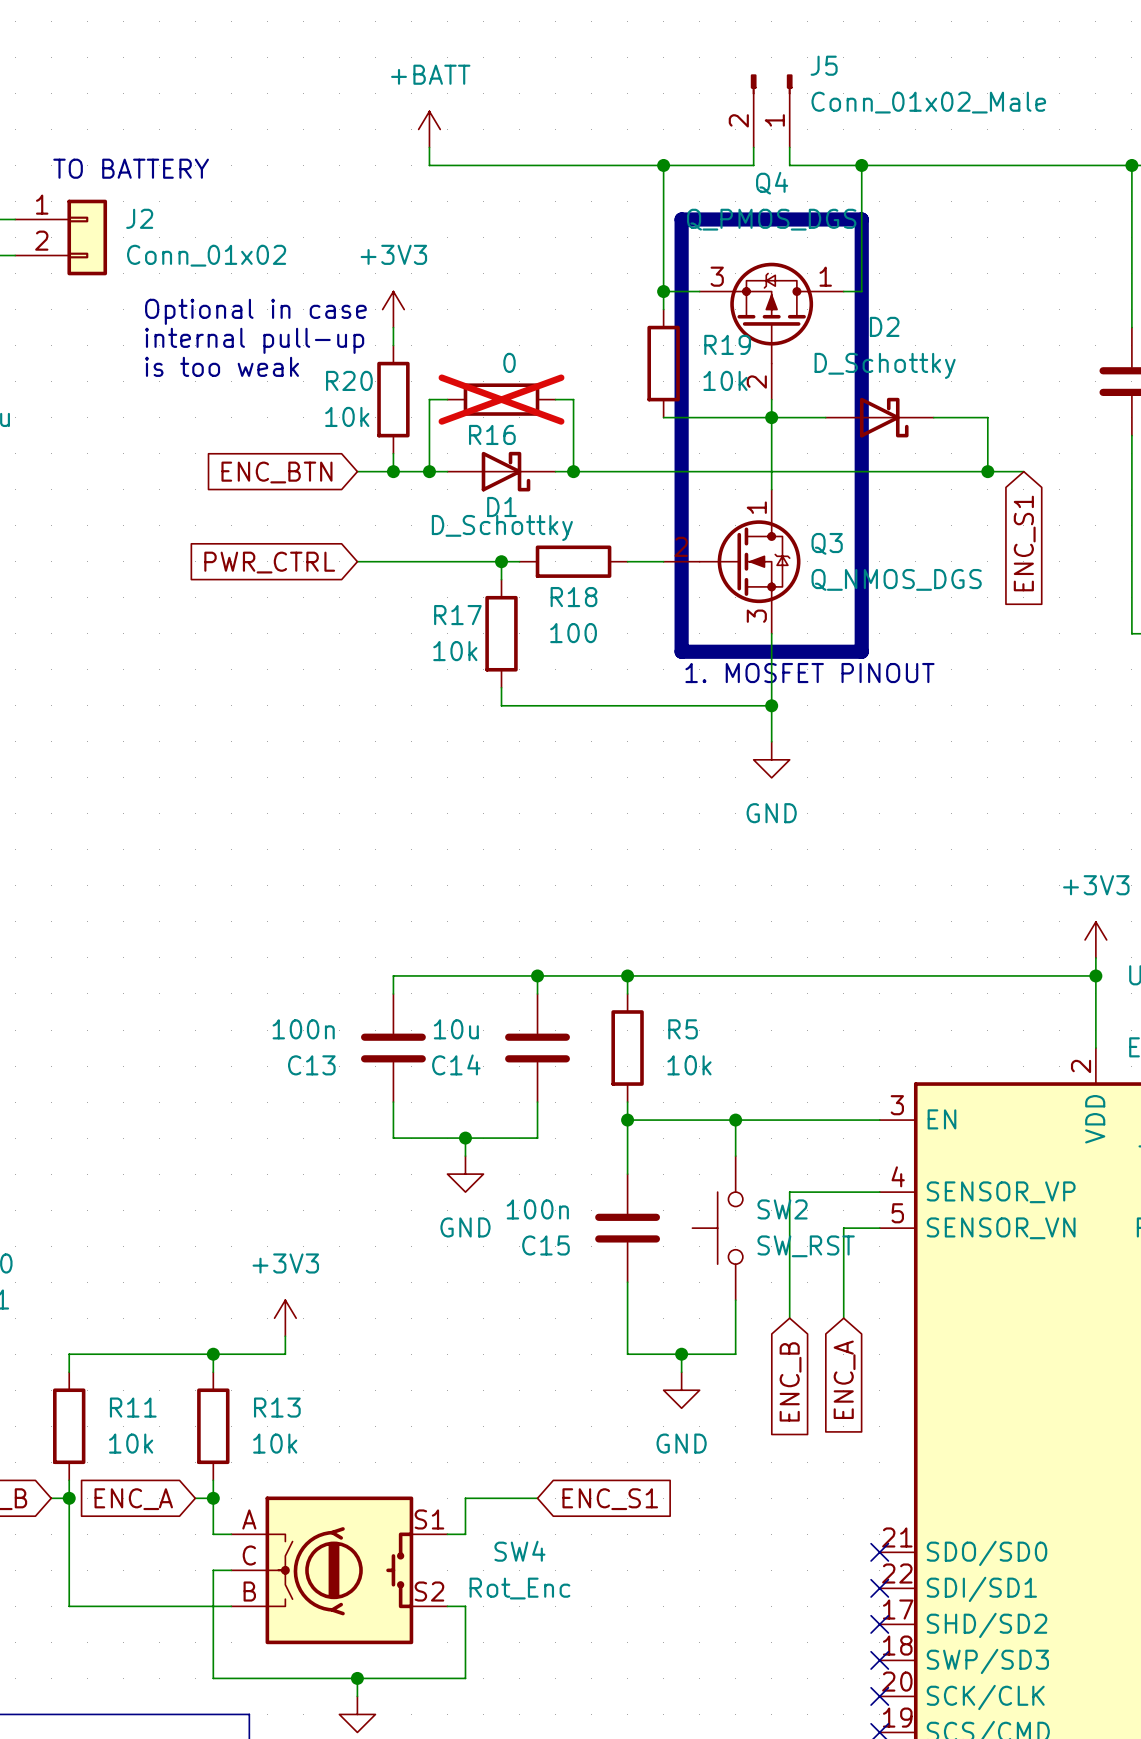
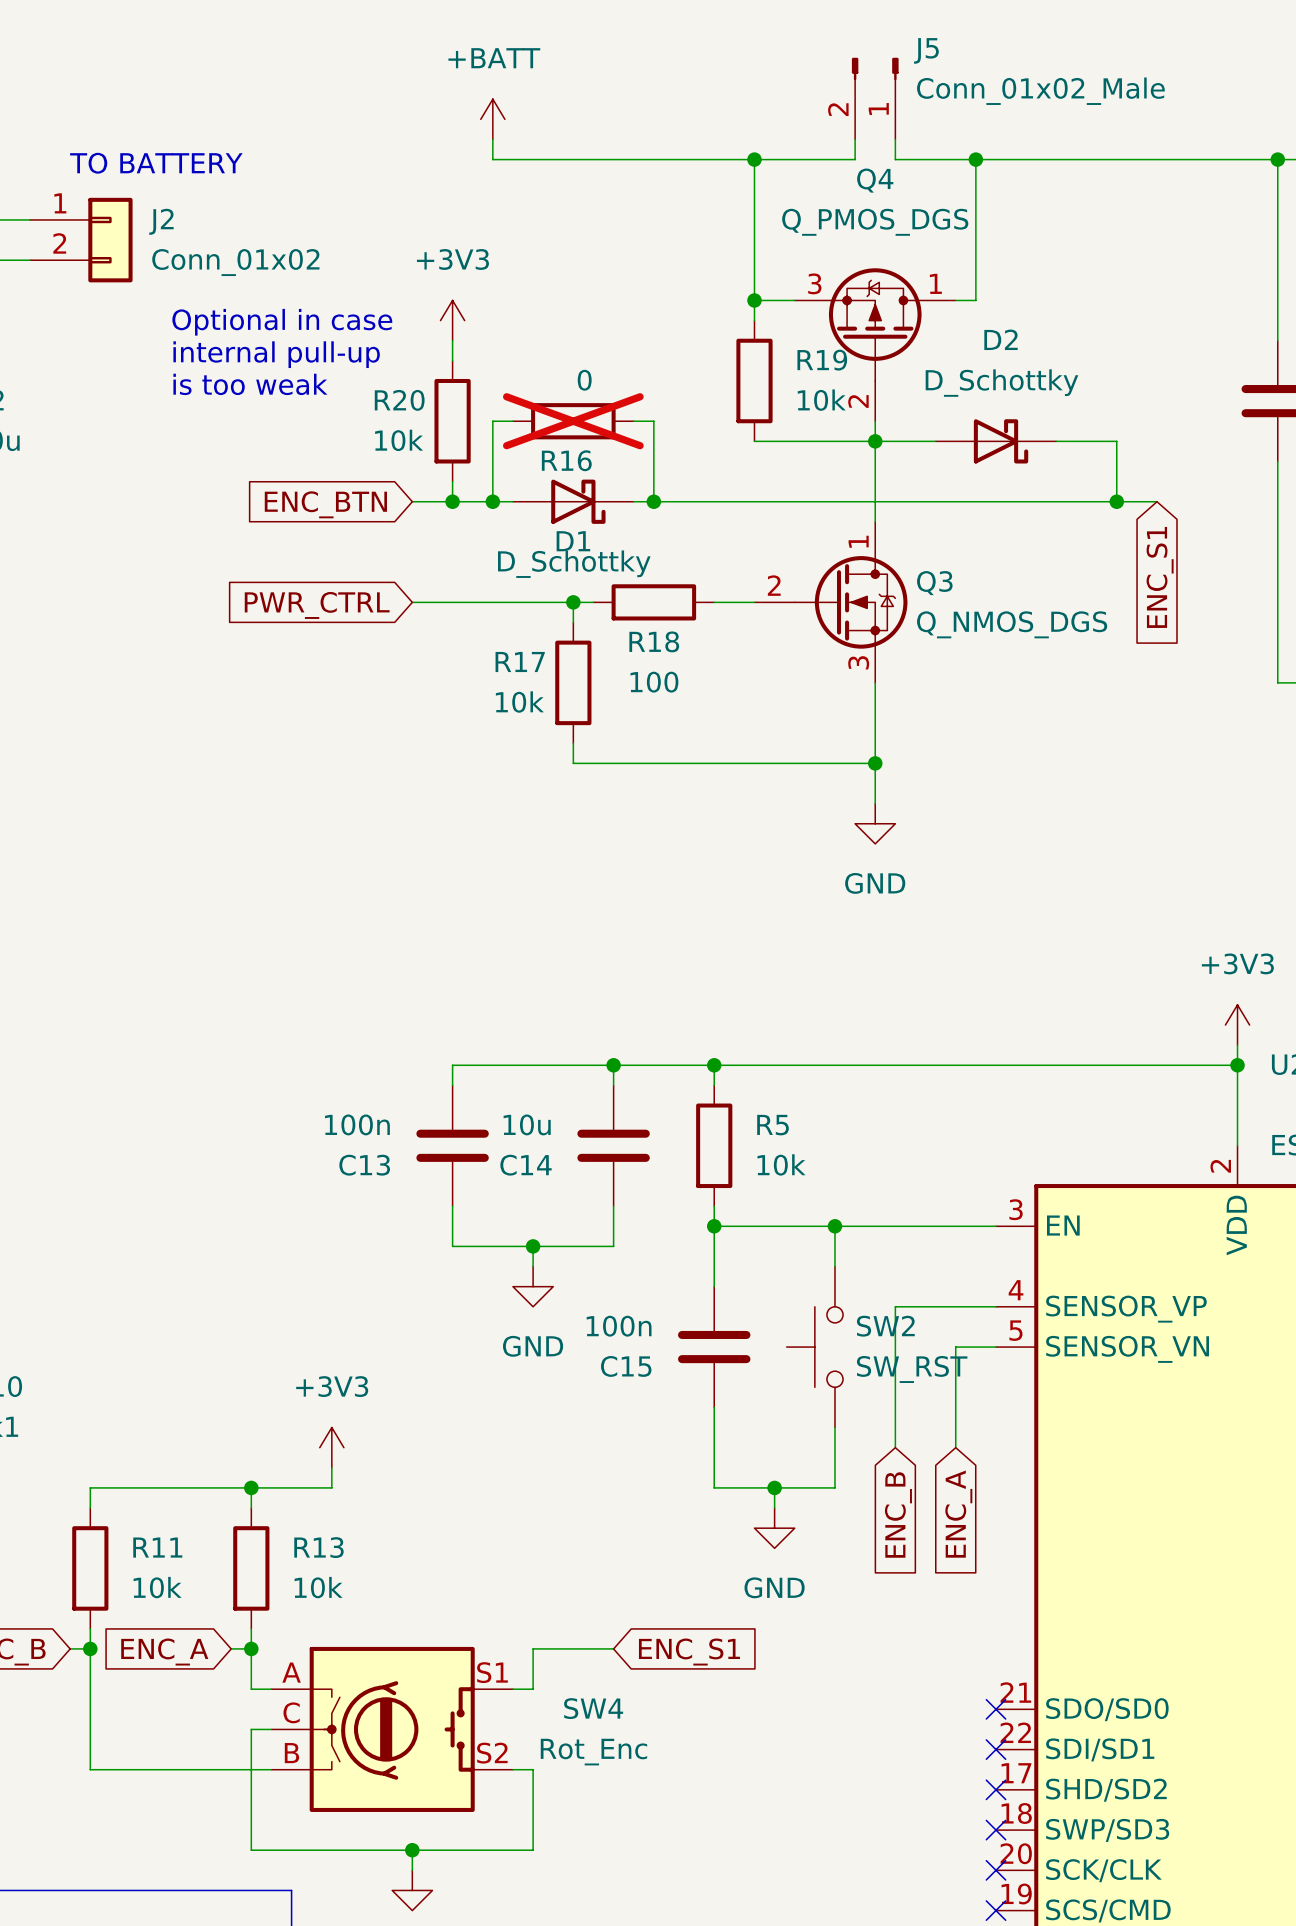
line: (681, 219) (861, 219) (861, 651) (681, 651) (681, 219) -> none
text: 1. MOSFET PINOUT (809, 673) -> none

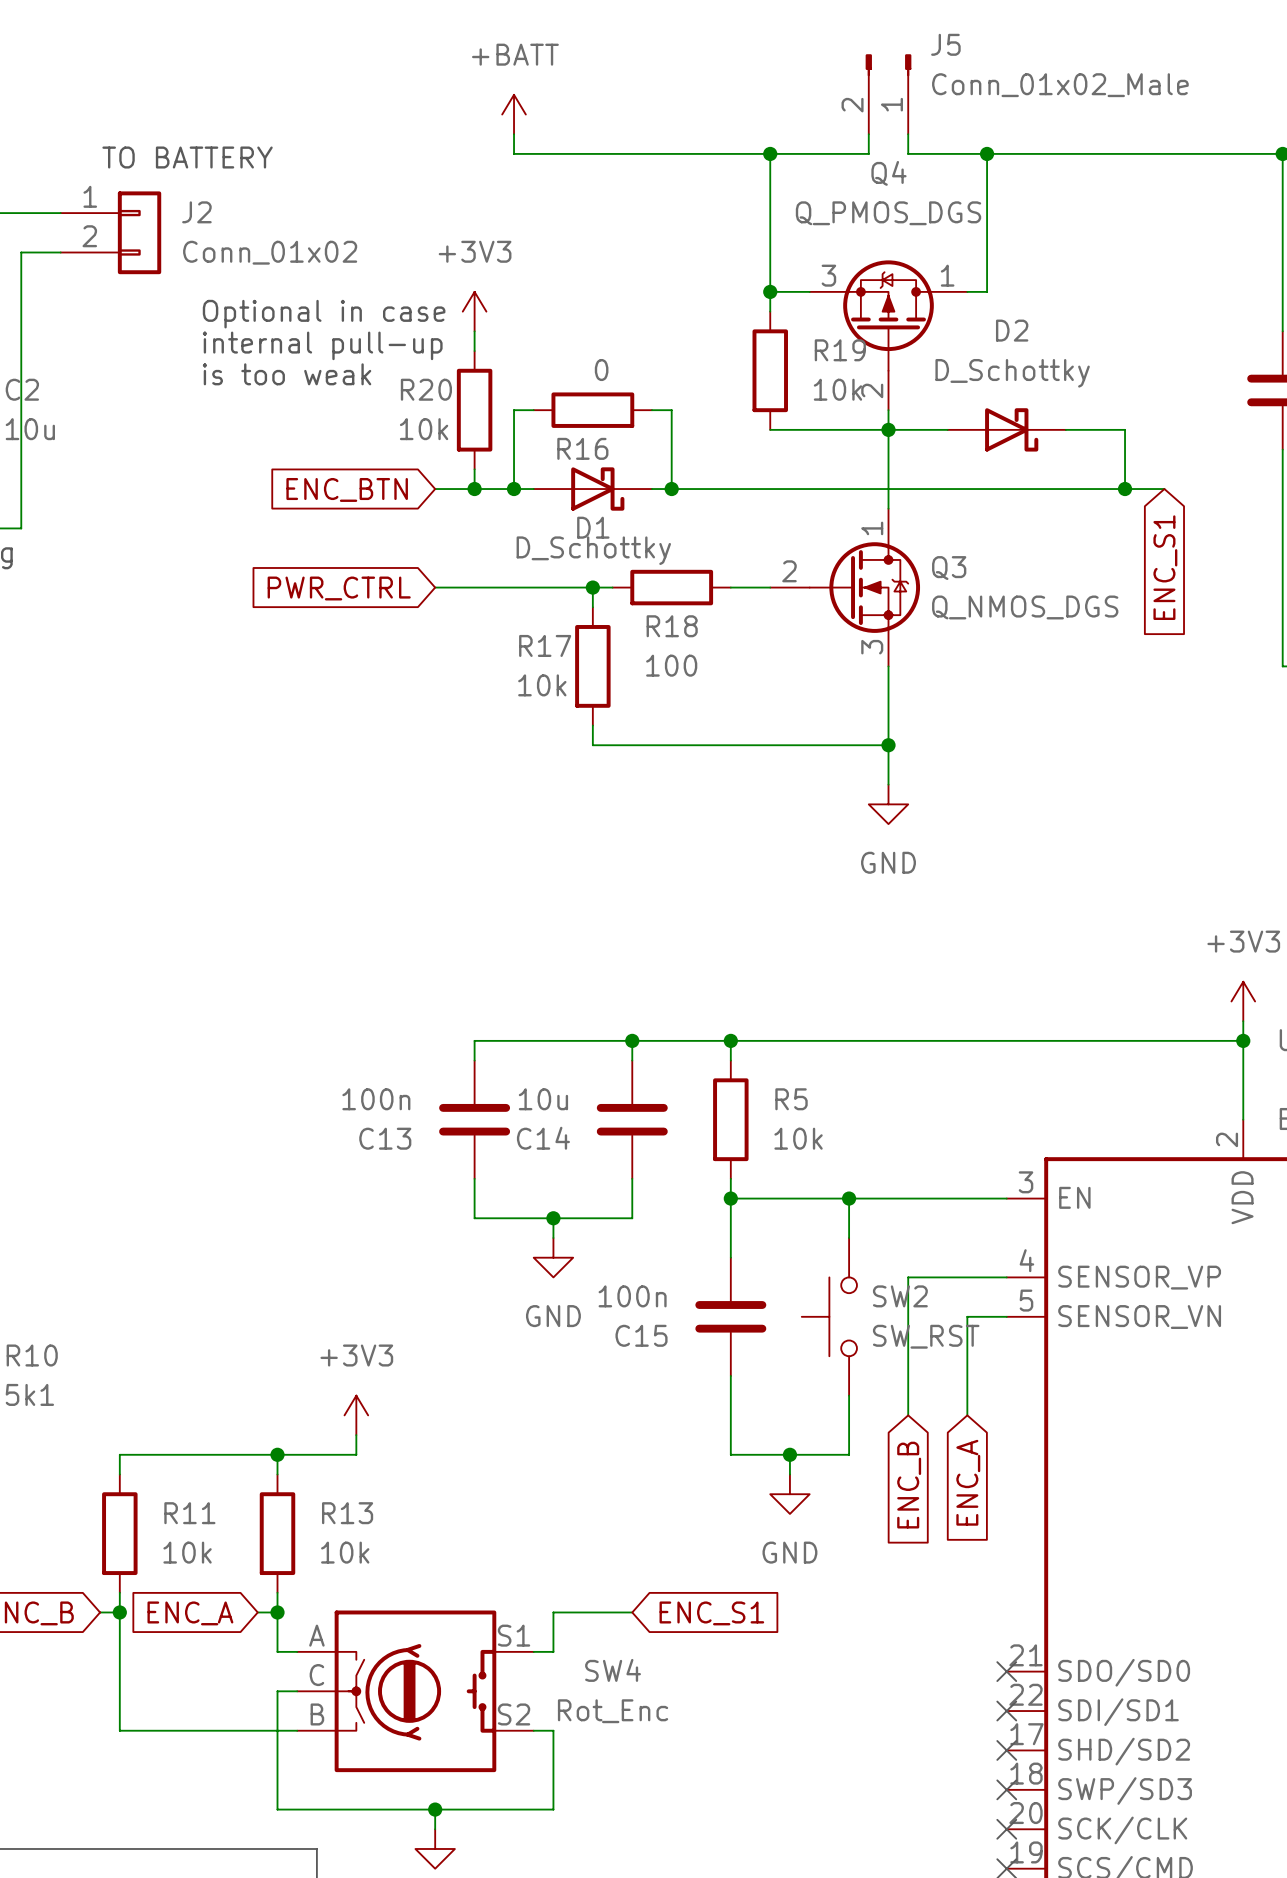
R16 do-not-place cross: (573, 421) -> none

